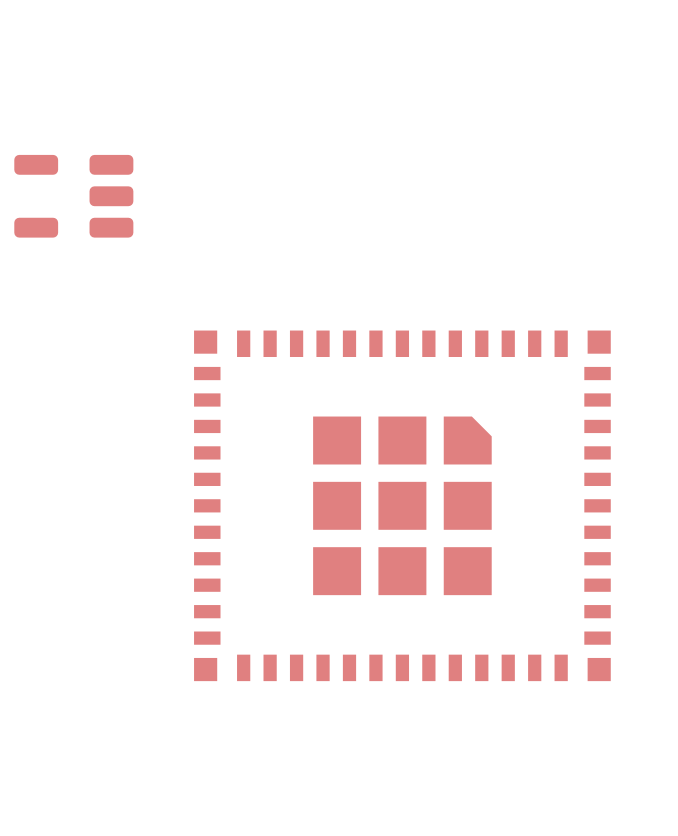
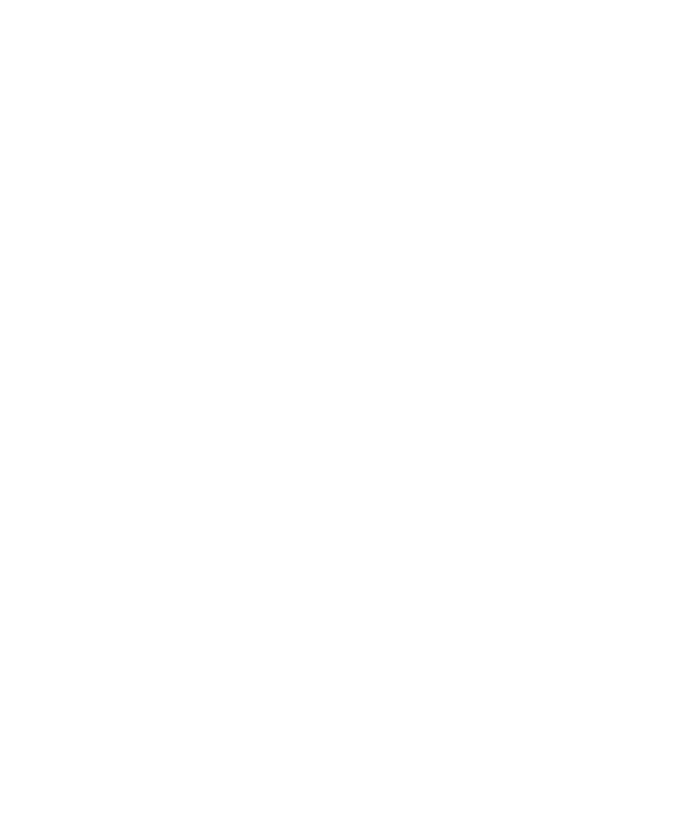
part: (73, 196) -> none
part: (402, 505) -> none

